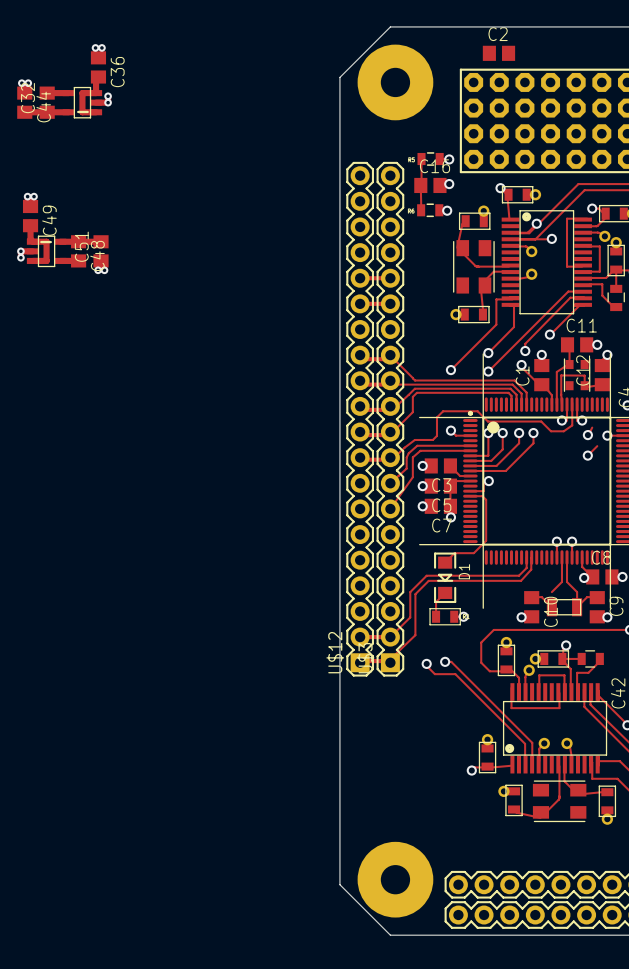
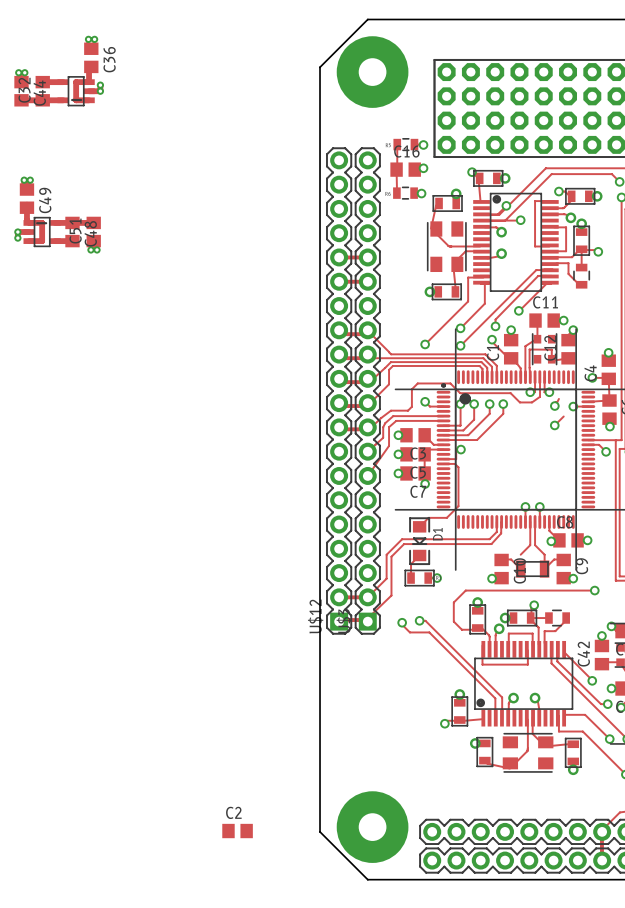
C2 position: (498, 53) -> (237, 831)

